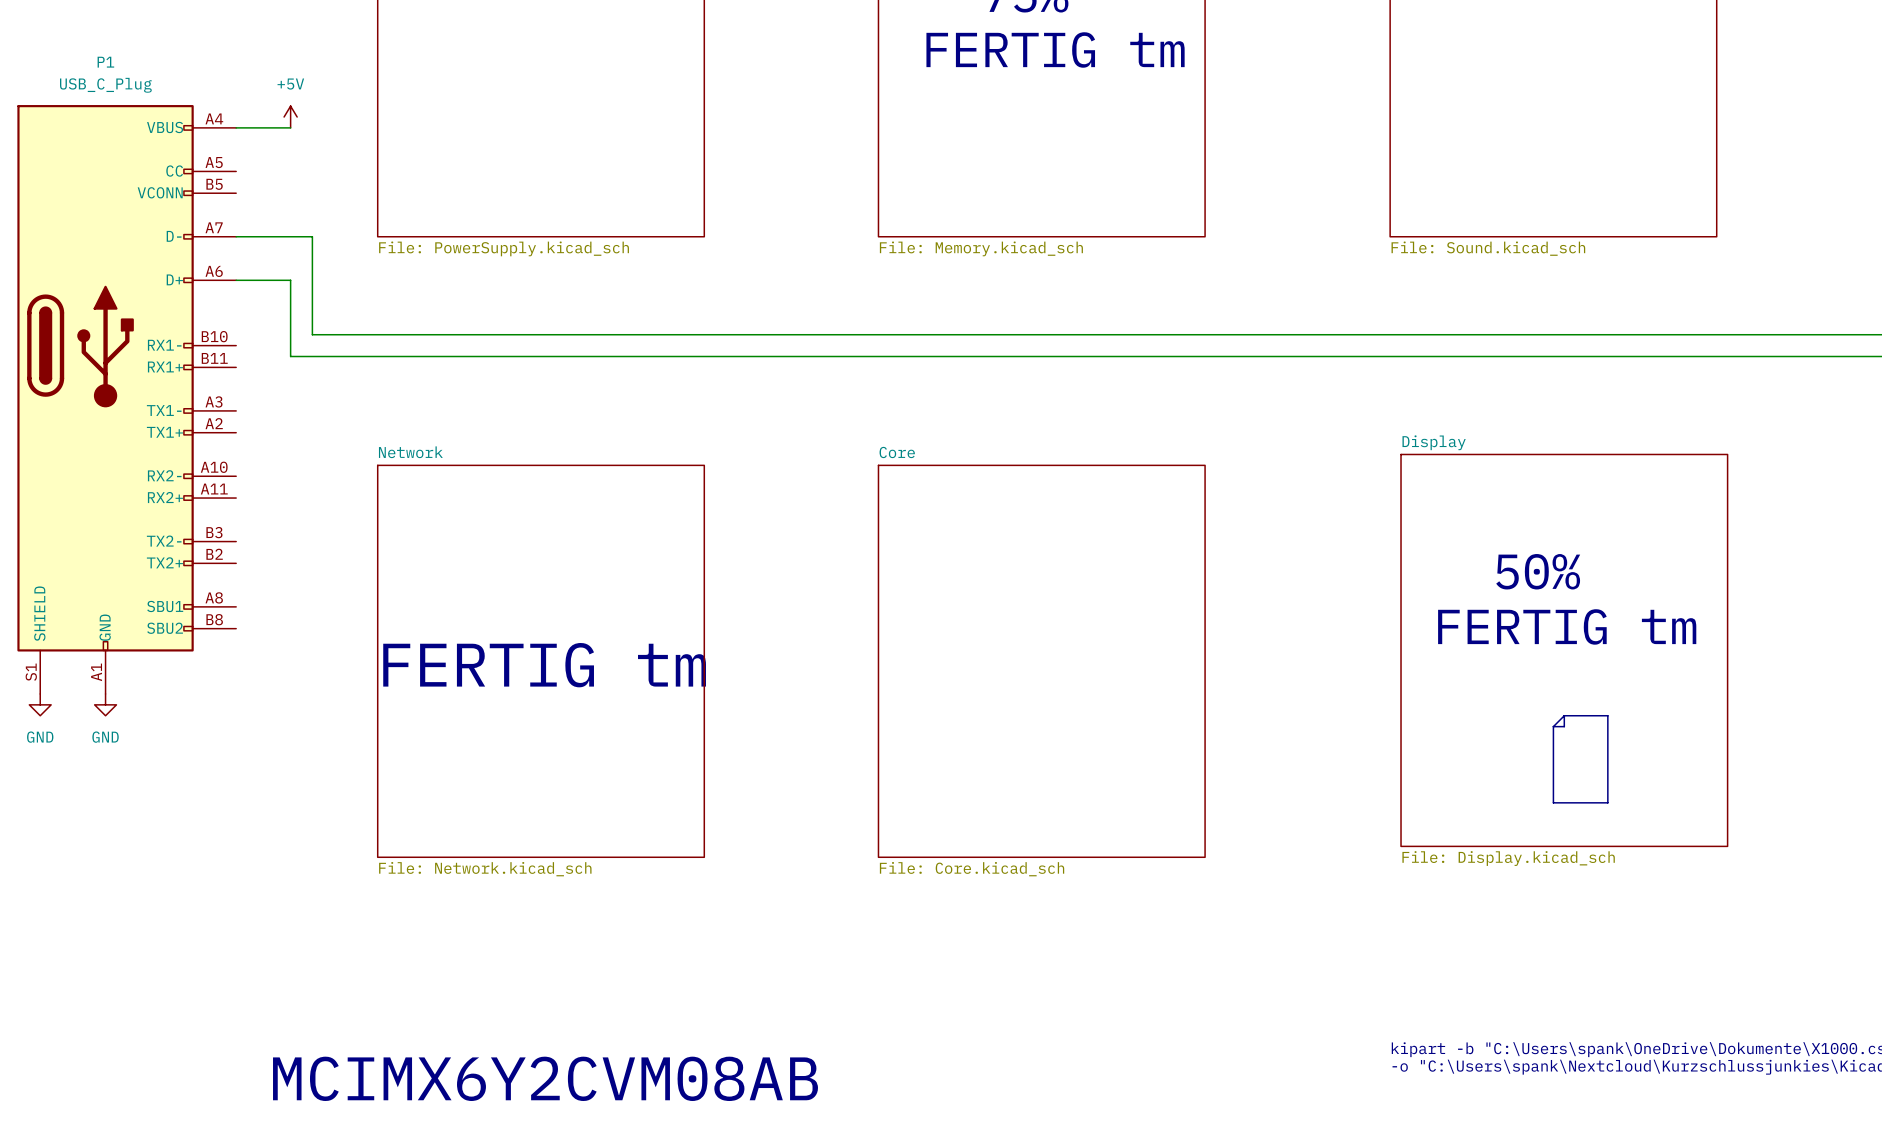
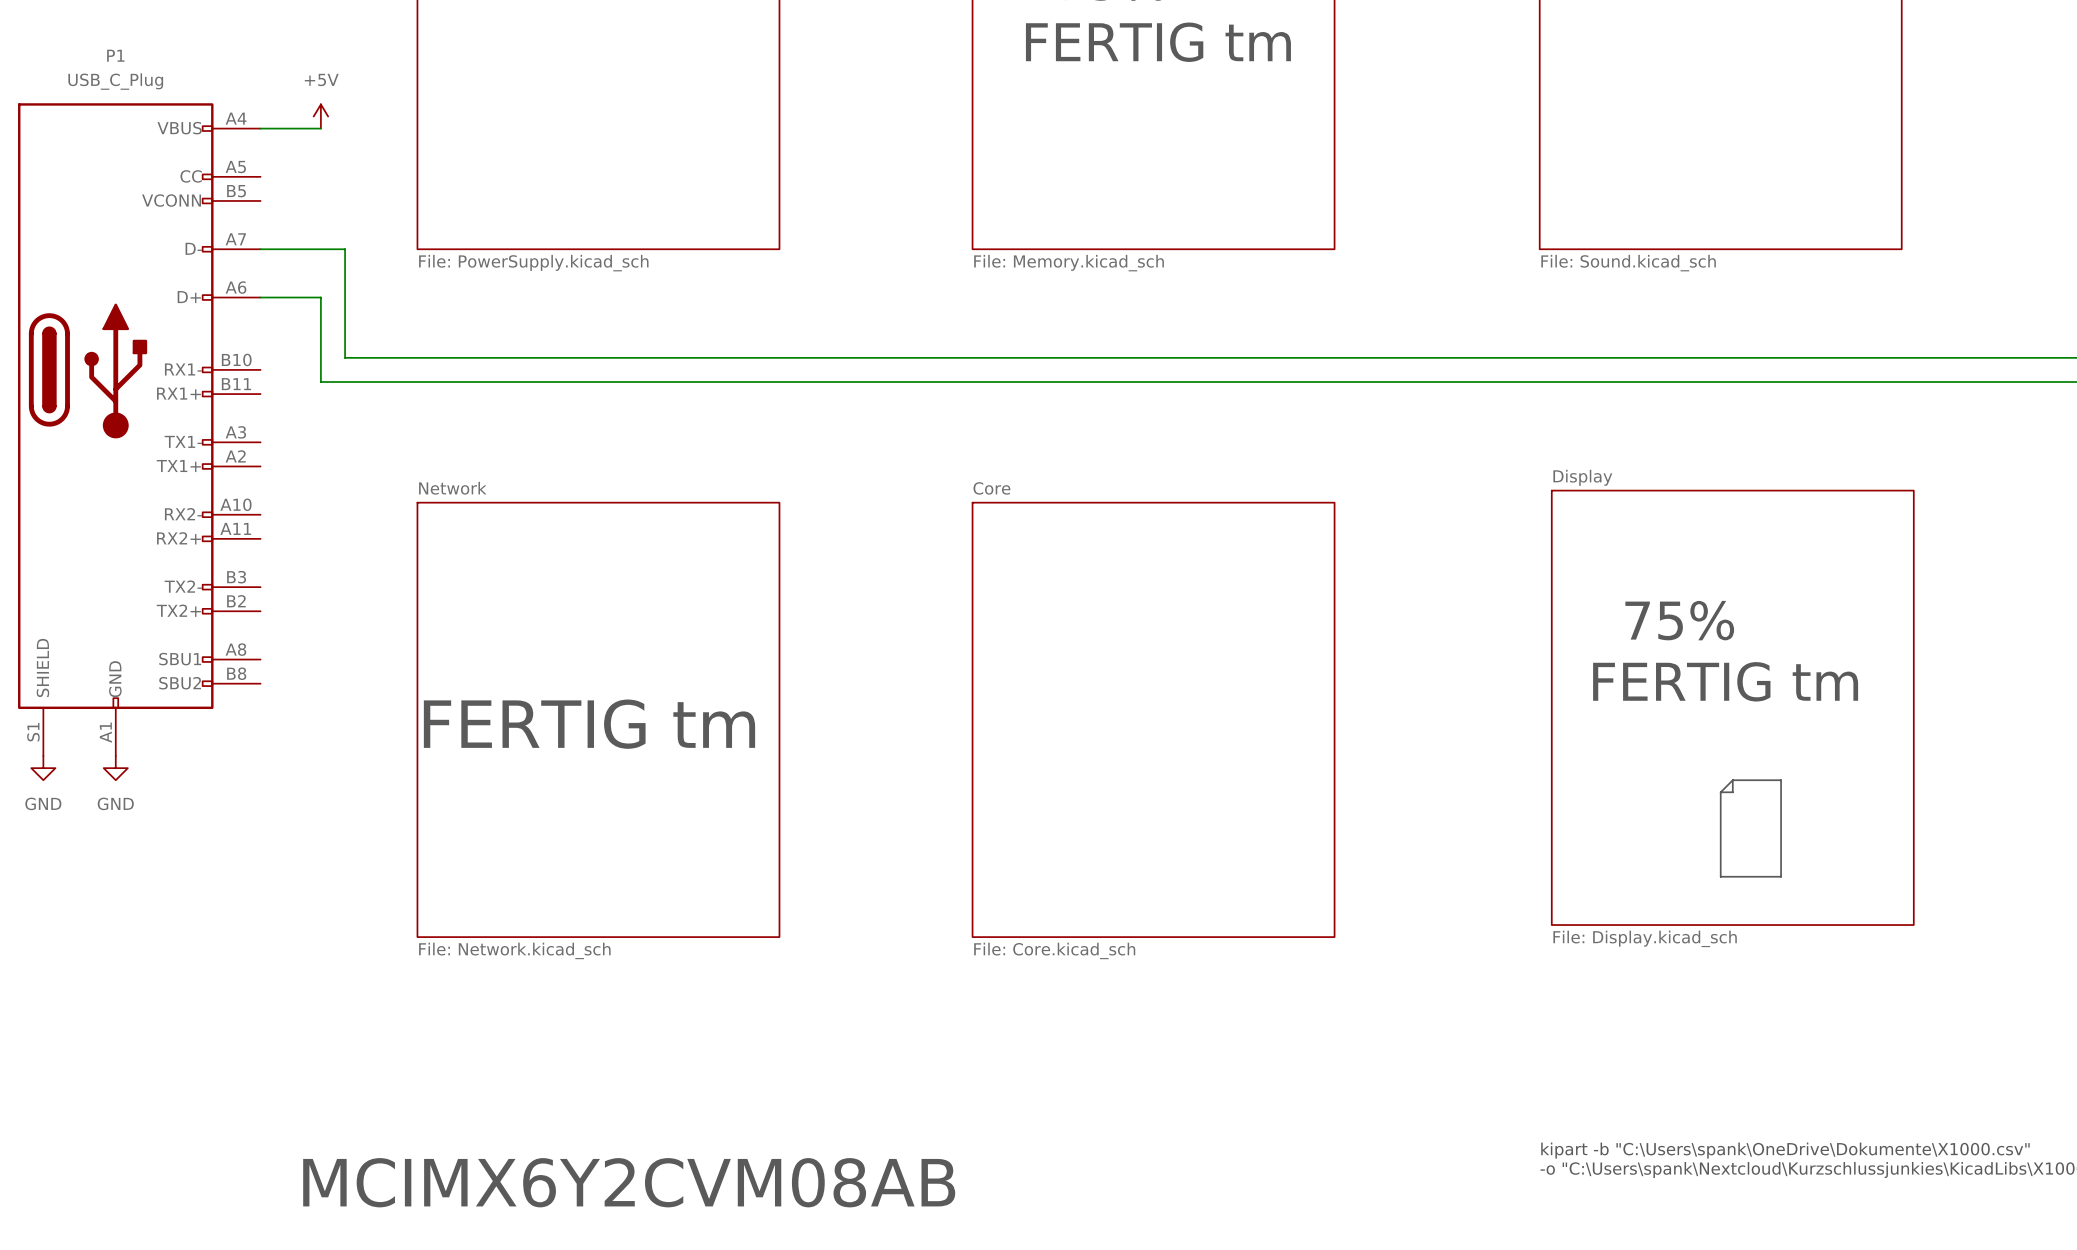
text: 50% (1538, 571) -> 75% (1679, 620)

